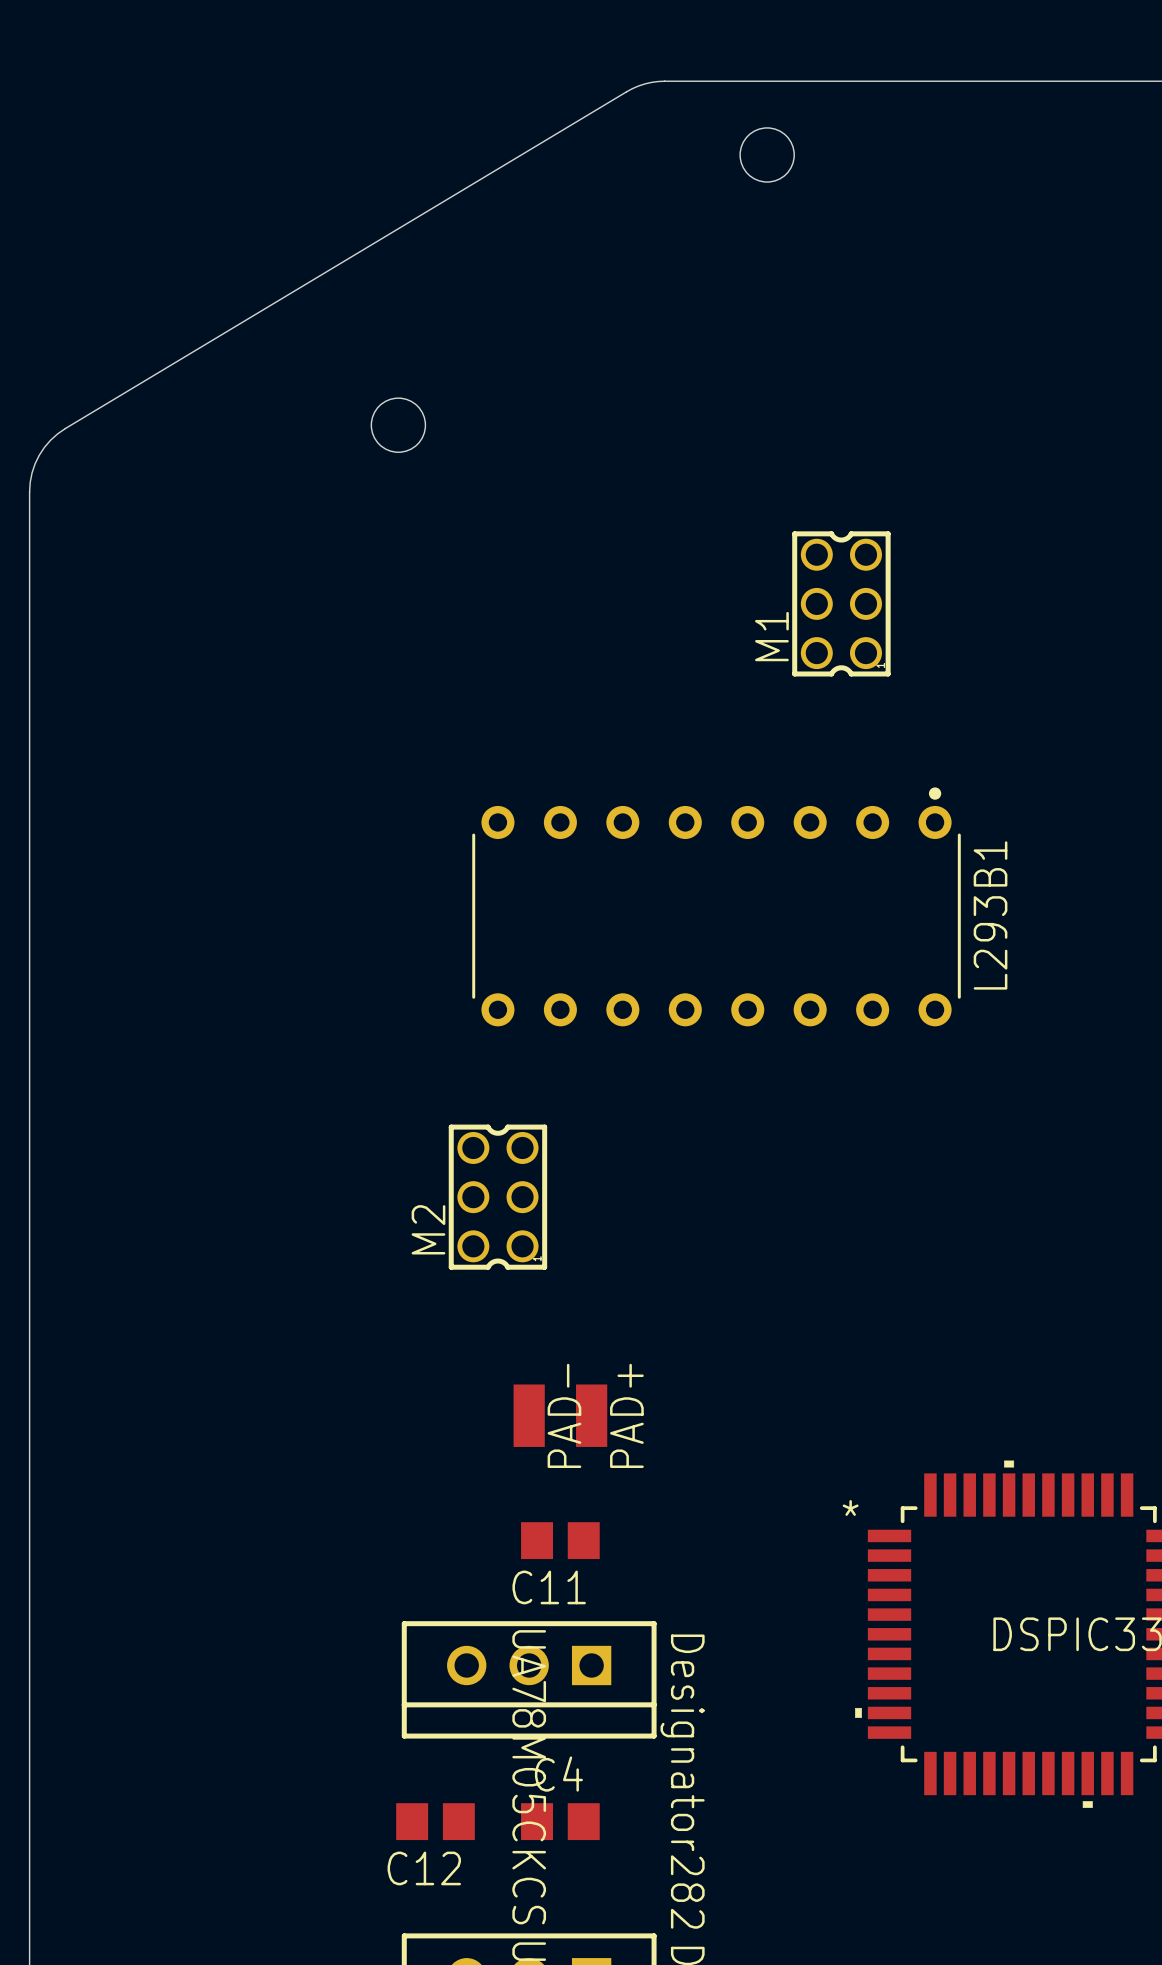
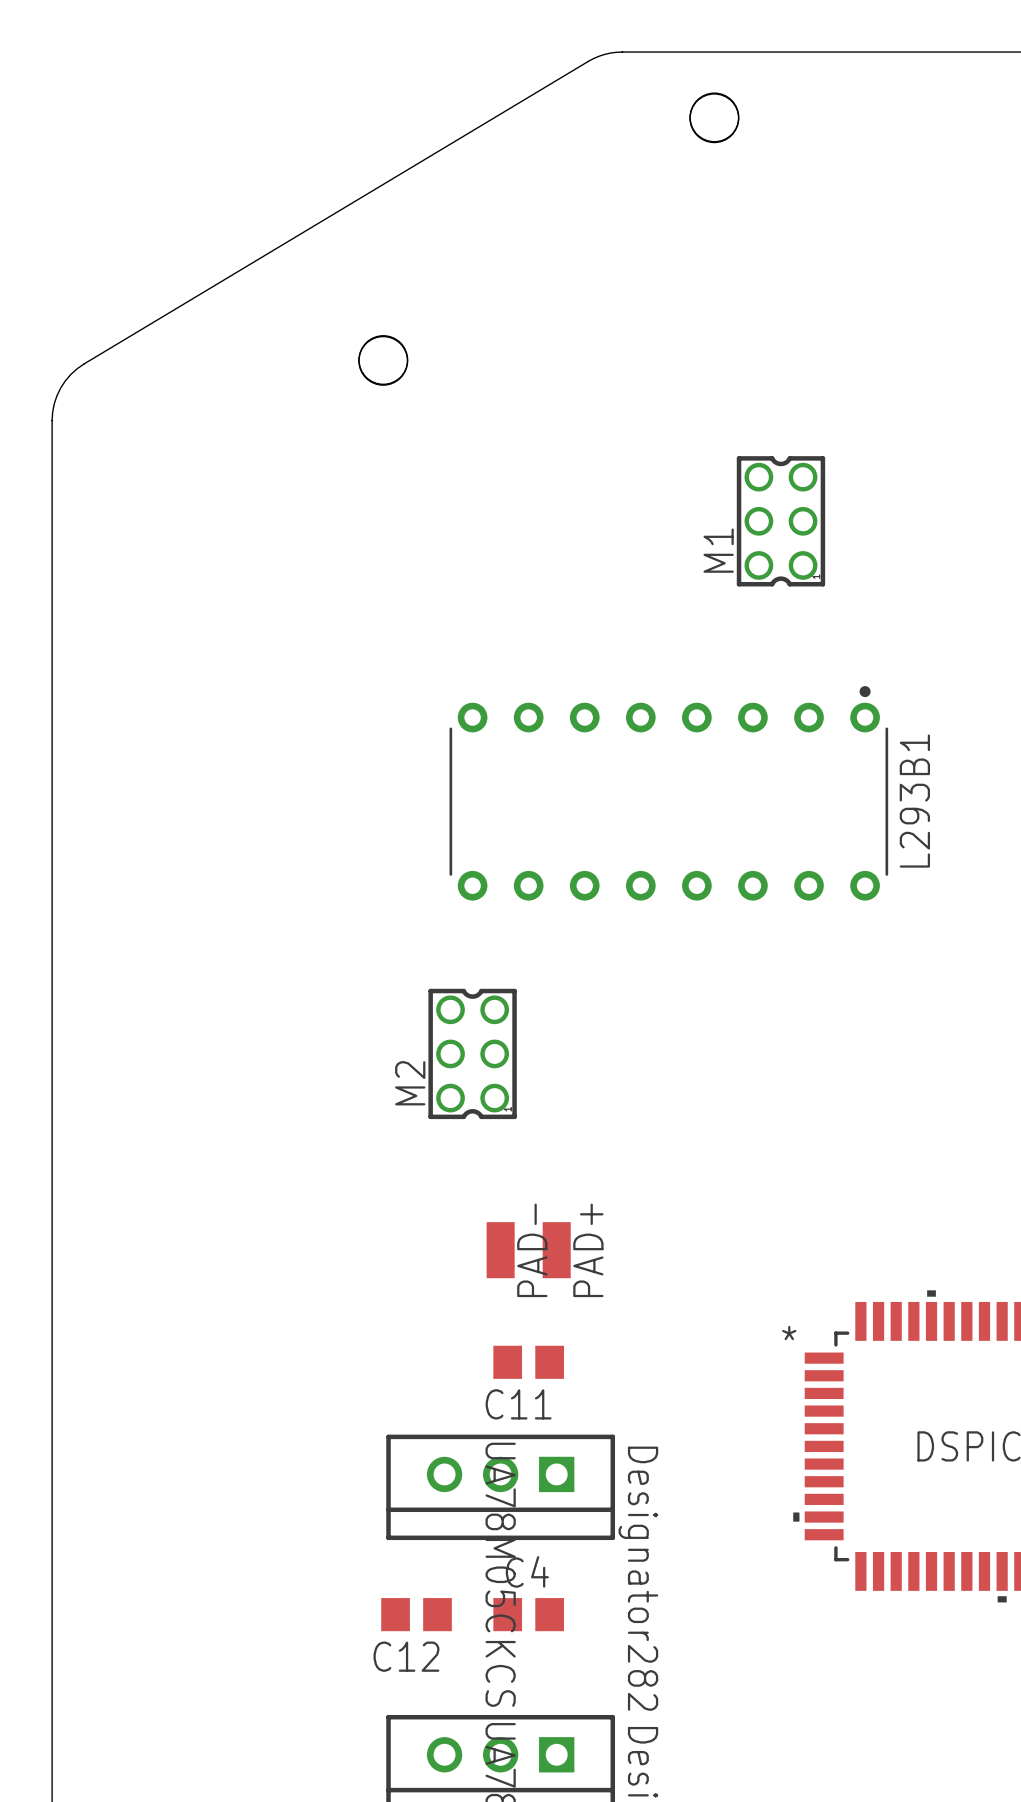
round board edge: none -> [690, 93, 739, 142]
round board edge: none -> [359, 335, 408, 385]

